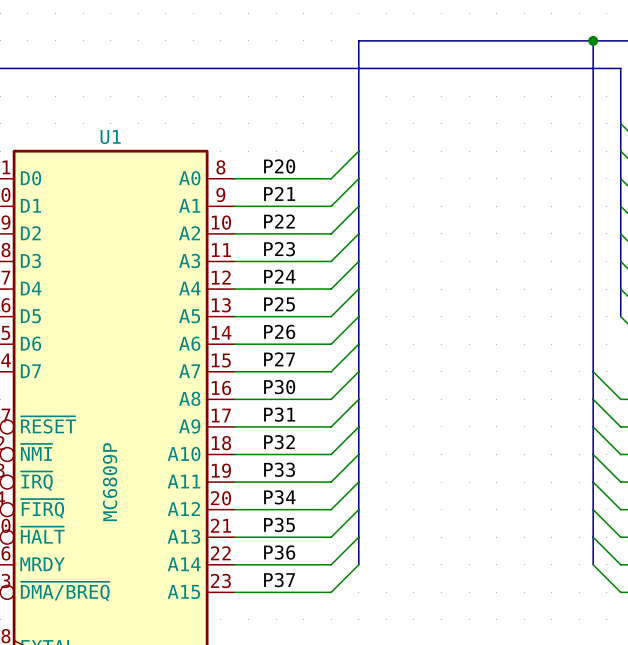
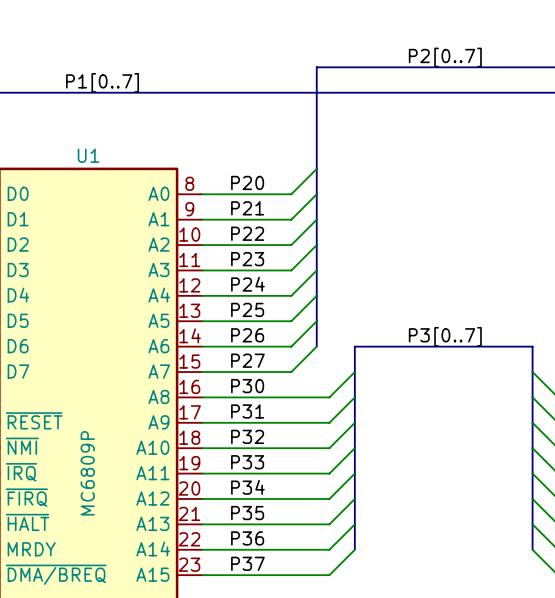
label: none -> P2[0..7] (445, 57)
bus: (593, 40) (593, 344) -> (354, 549) (354, 346) (532, 346)
junction: (593, 40) -> none
label: none -> P1[0..7] (102, 82)
label: none -> P3[0..7] (445, 336)
bus: (358, 344) (358, 564) -> none
wire: (358, 371) (331, 399) -> (354, 372) (329, 397) (291, 397)
wire: (358, 399) (331, 426) -> (354, 397) (329, 422) (291, 422)
wire: (358, 426) (331, 454) -> (354, 422) (329, 448) (291, 448)
wire: (358, 454) (331, 482) -> (354, 448) (329, 473) (291, 473)
wire: (358, 482) (331, 509) -> (354, 473) (329, 498) (291, 498)
wire: (358, 509) (331, 537) -> (354, 498) (329, 524) (291, 524)
wire: (358, 537) (331, 564) -> (354, 524) (329, 549) (291, 549)
wire: (358, 564) (331, 592) -> (354, 549) (329, 575) (291, 575)

